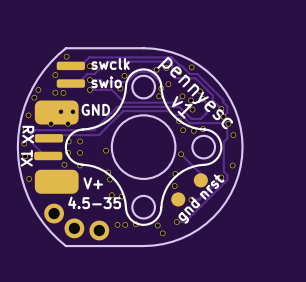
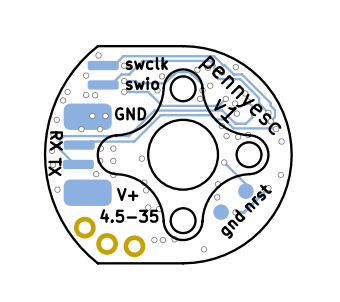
track: (228, 123) (227, 138) (223, 141) (223, 171) (227, 175) (227, 180) (185, 222) (176, 222) -> none
via: (176, 222) -> none
via: (157, 225) -> none

